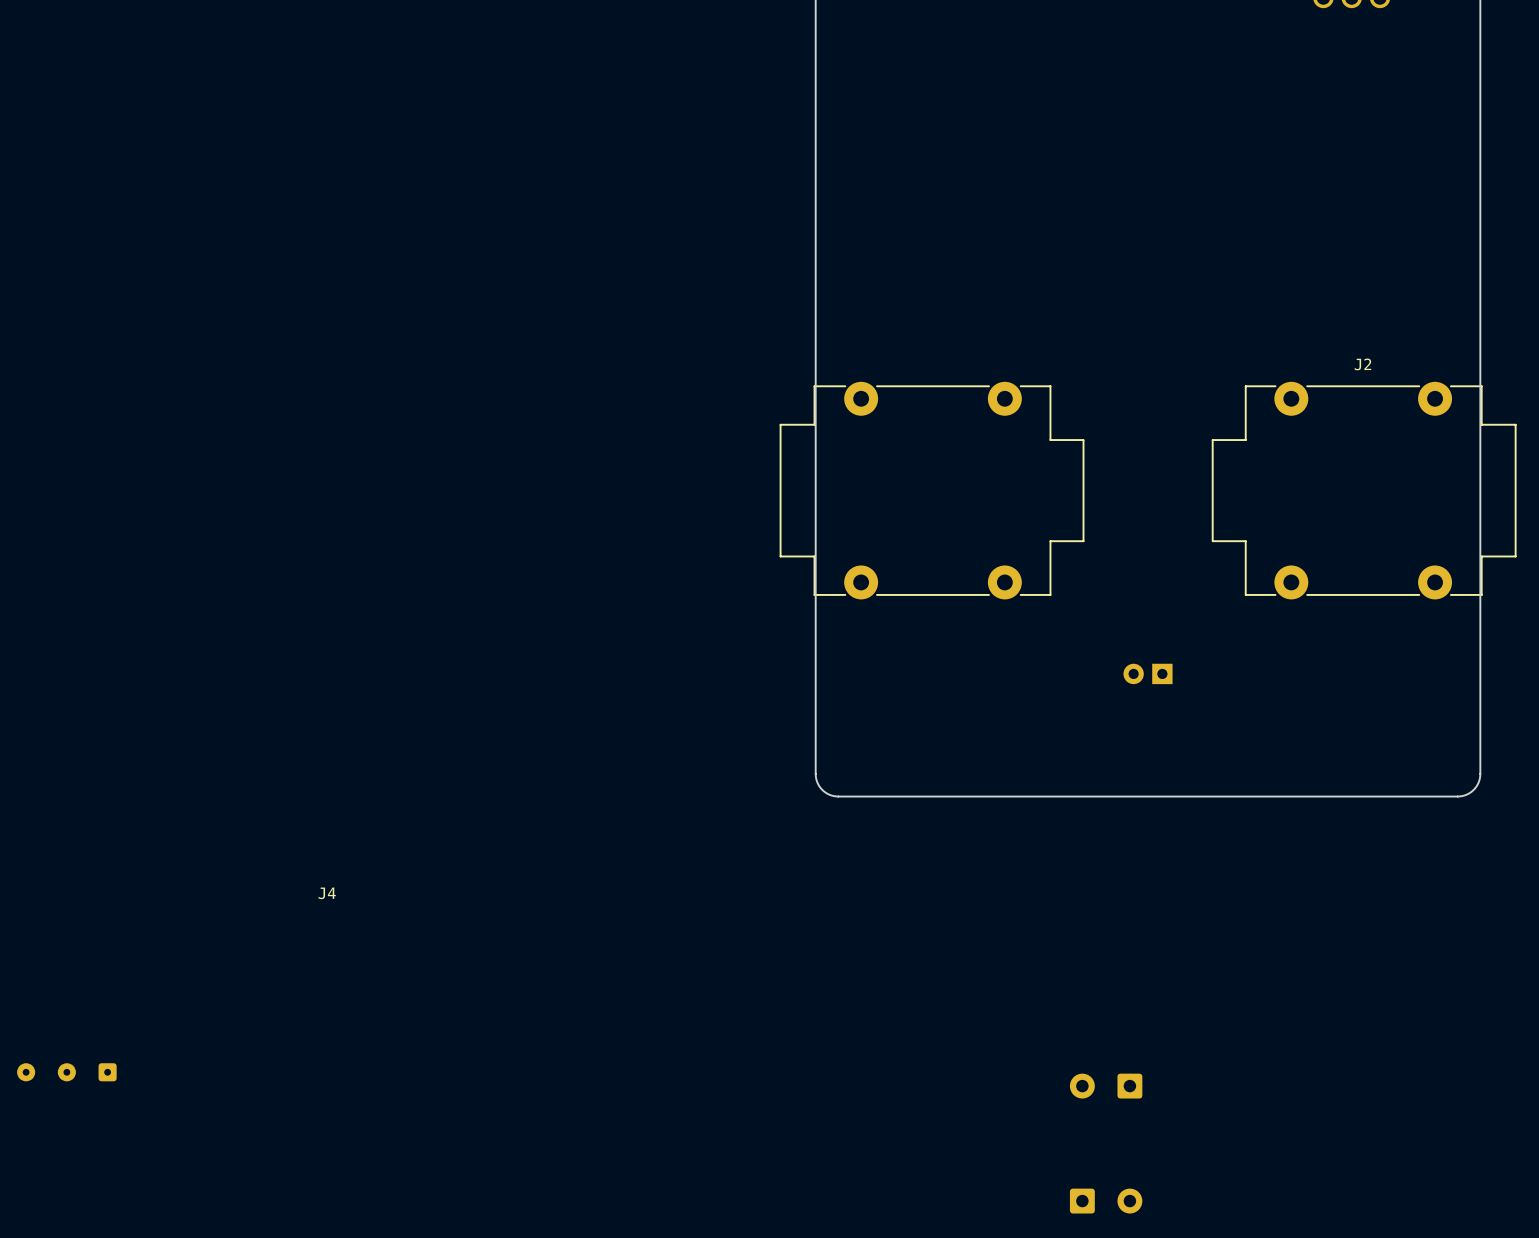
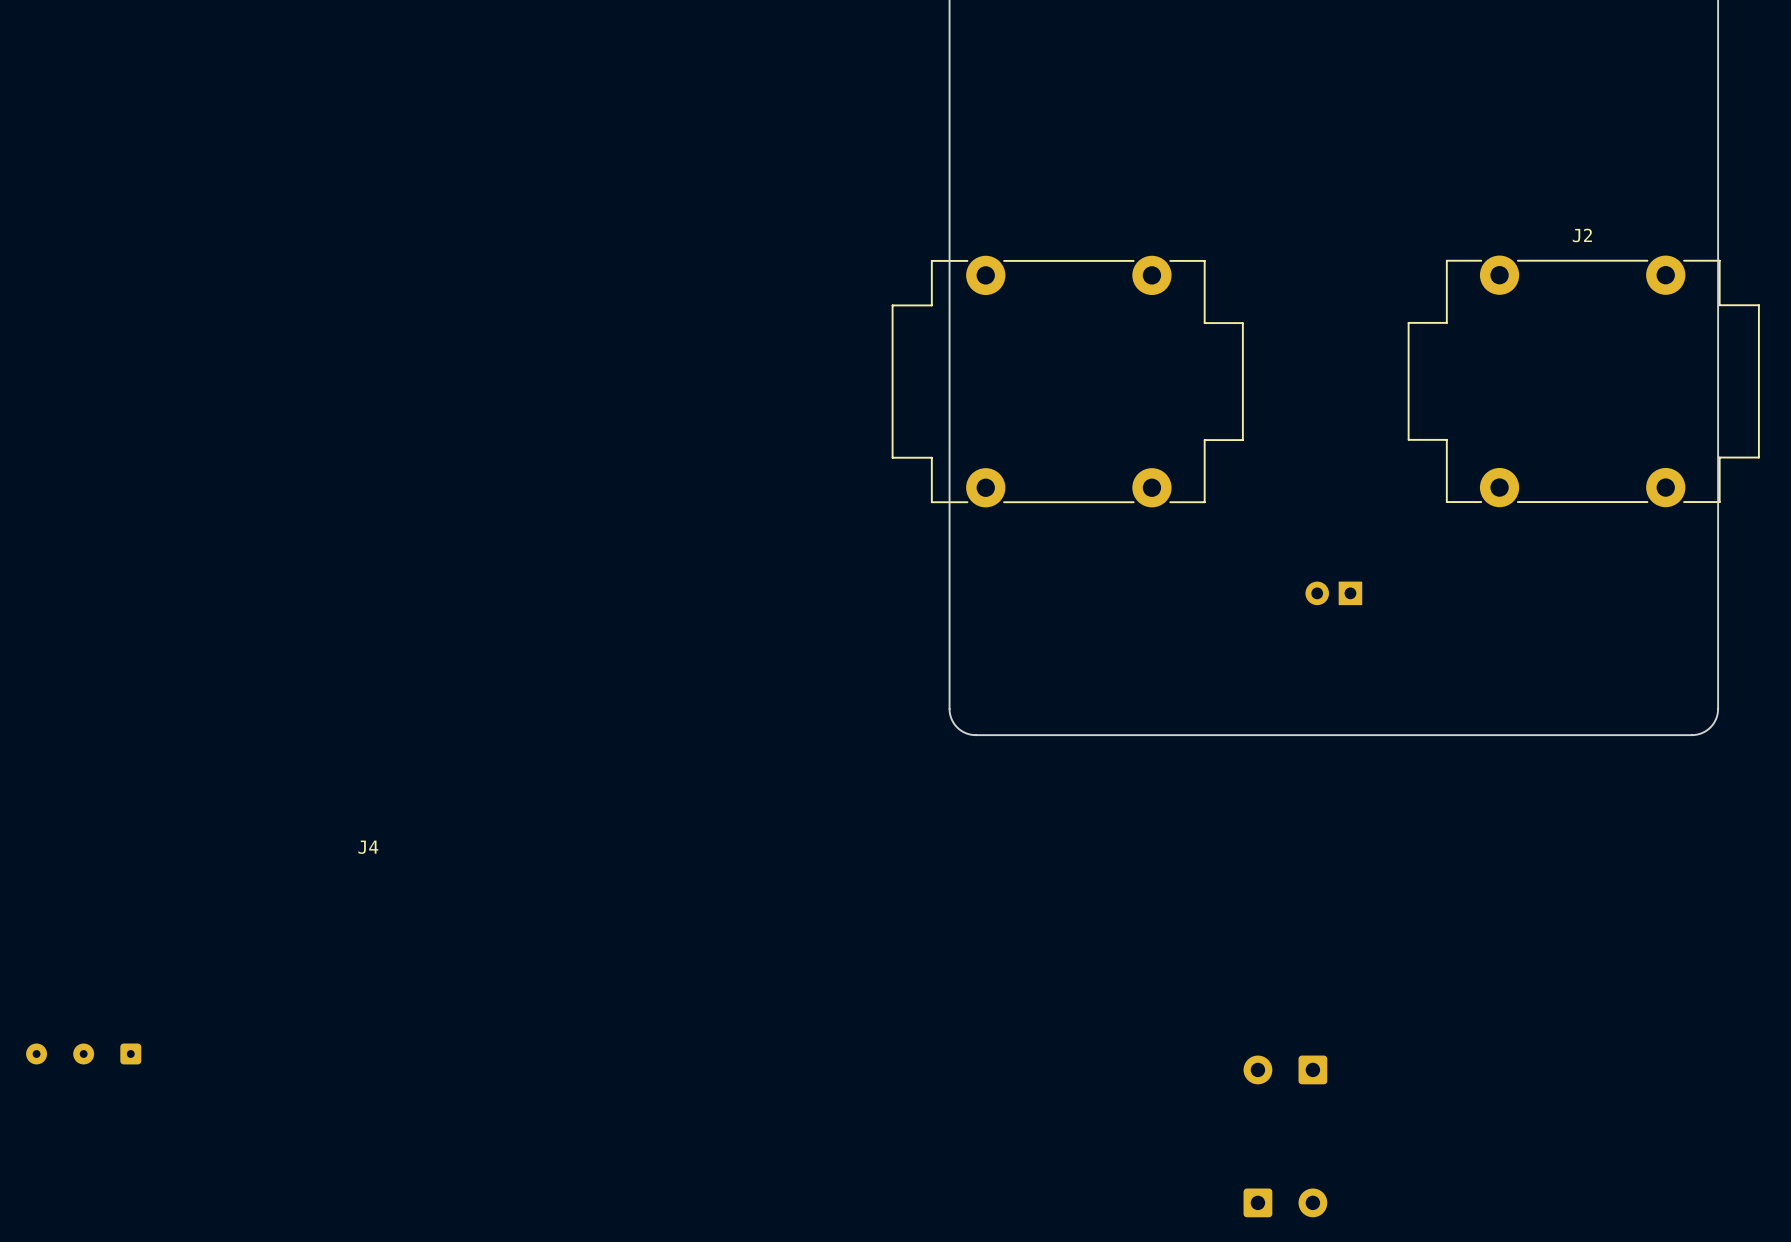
J4 position: (932, 490) -> (1067, 381)

